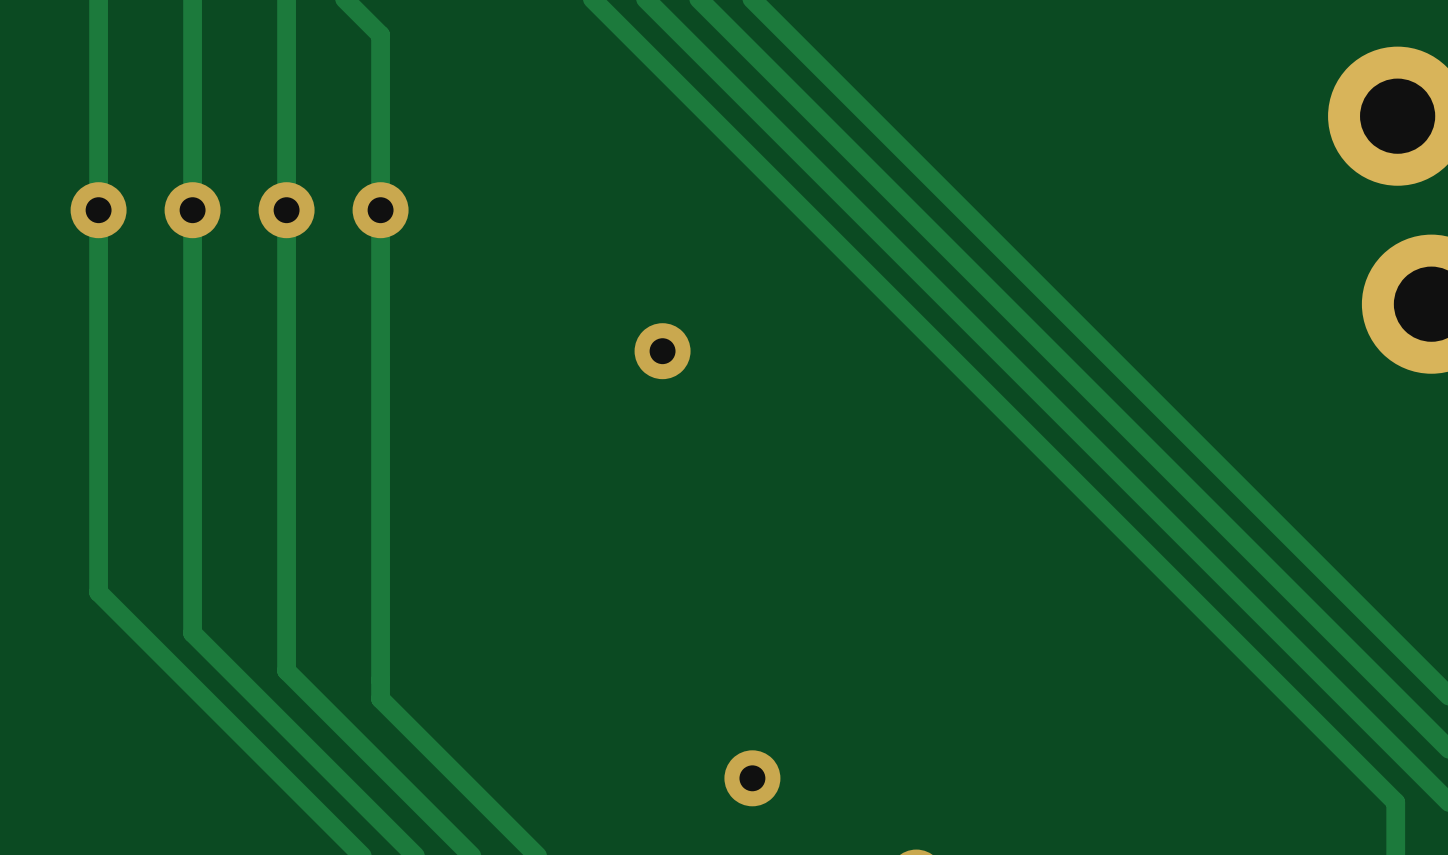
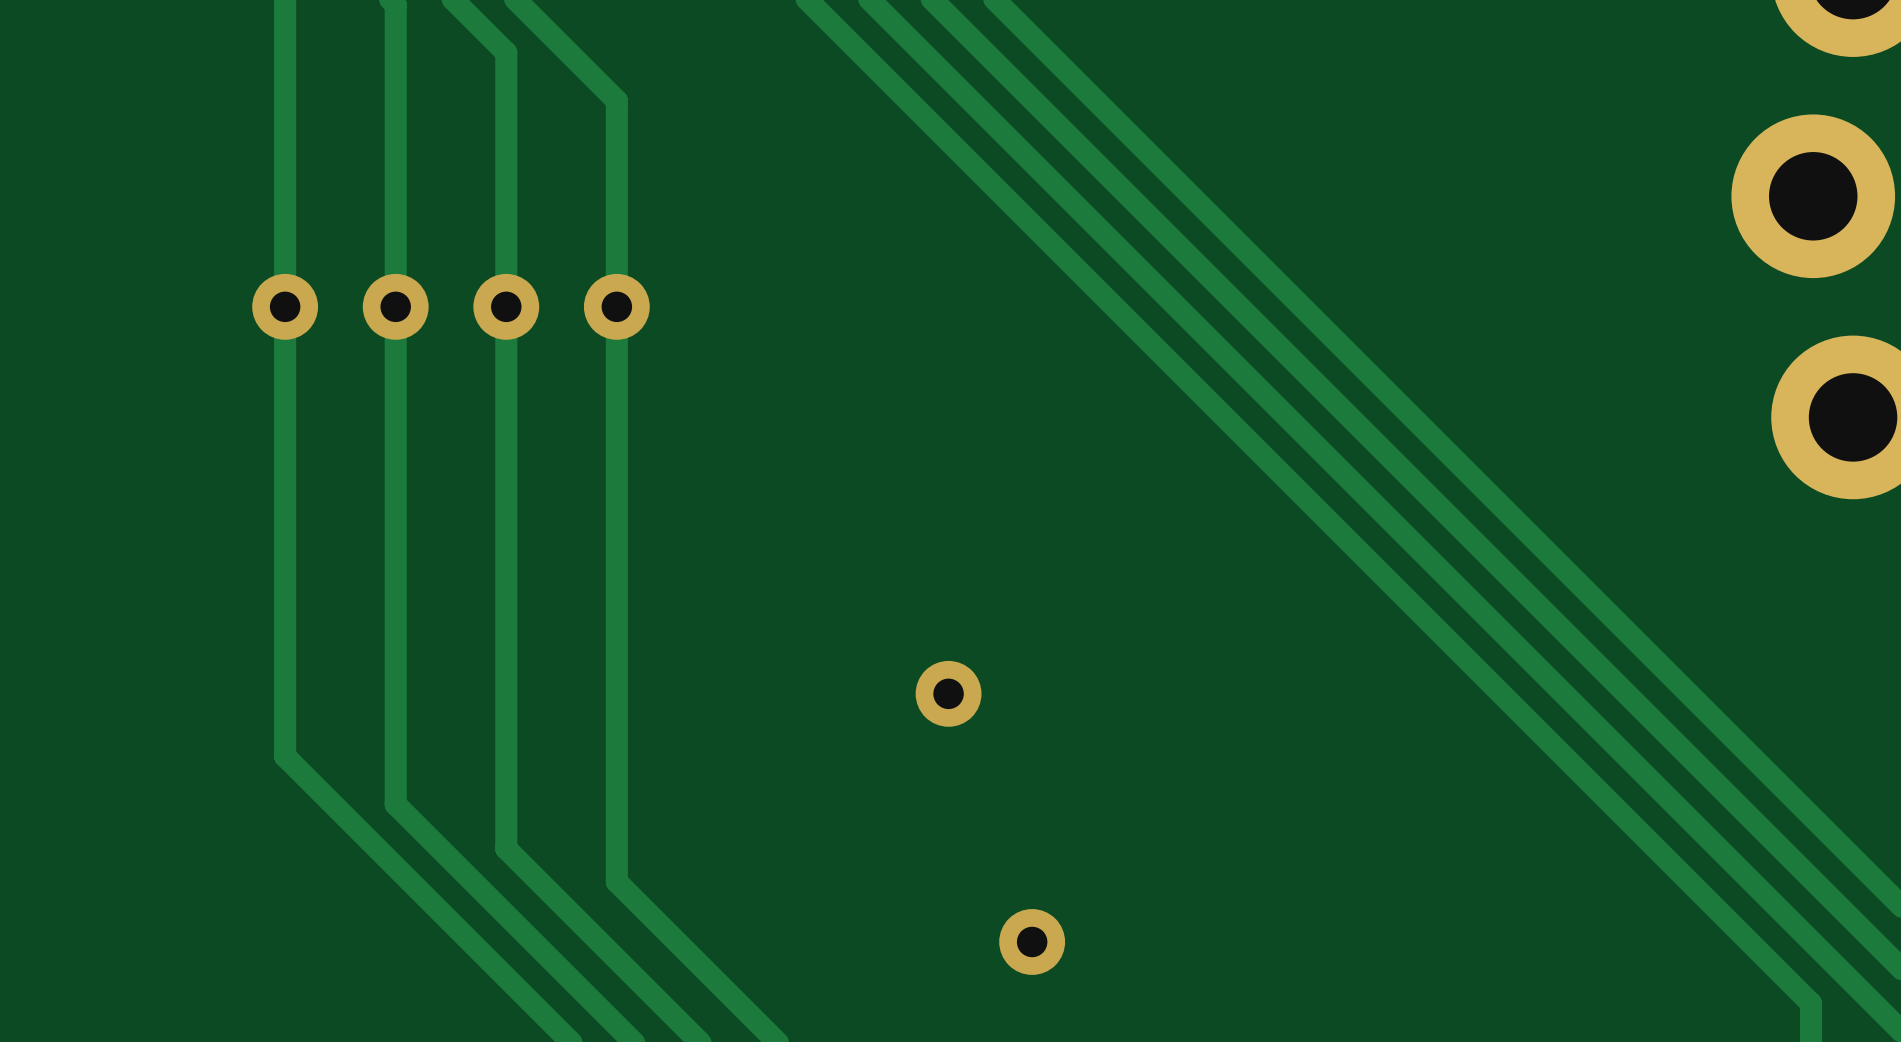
via: (662, 351) -> none
via: none -> (948, 693)
via position: (752, 778) -> (1032, 941)

